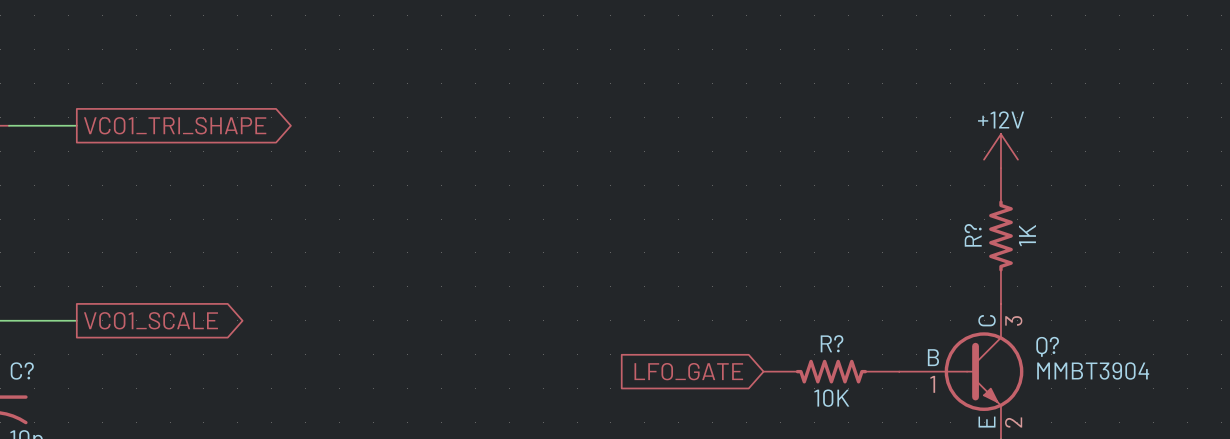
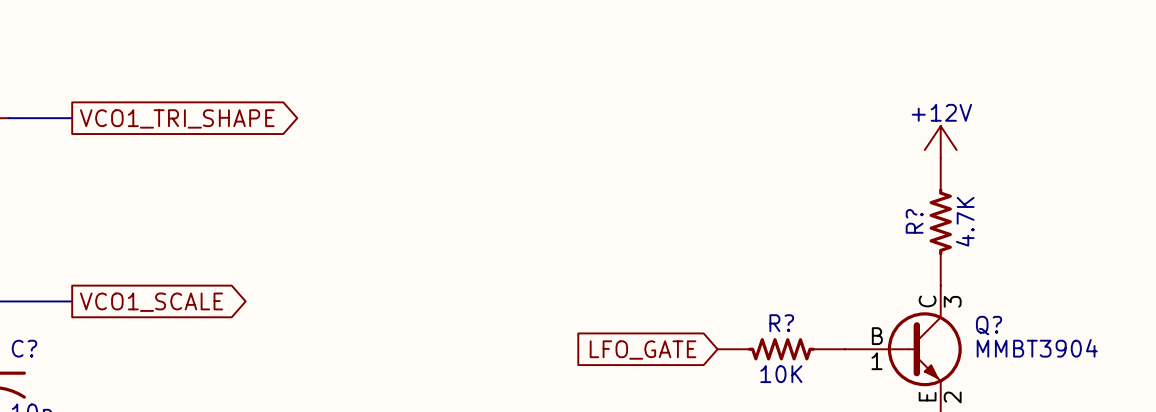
R? value: 1K (1027, 235) -> 4.7K (965, 221)

